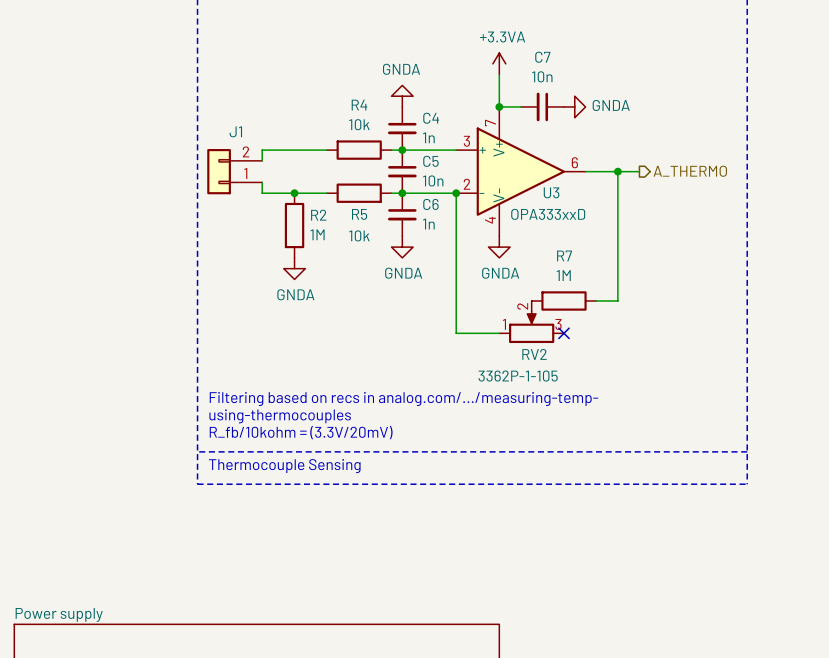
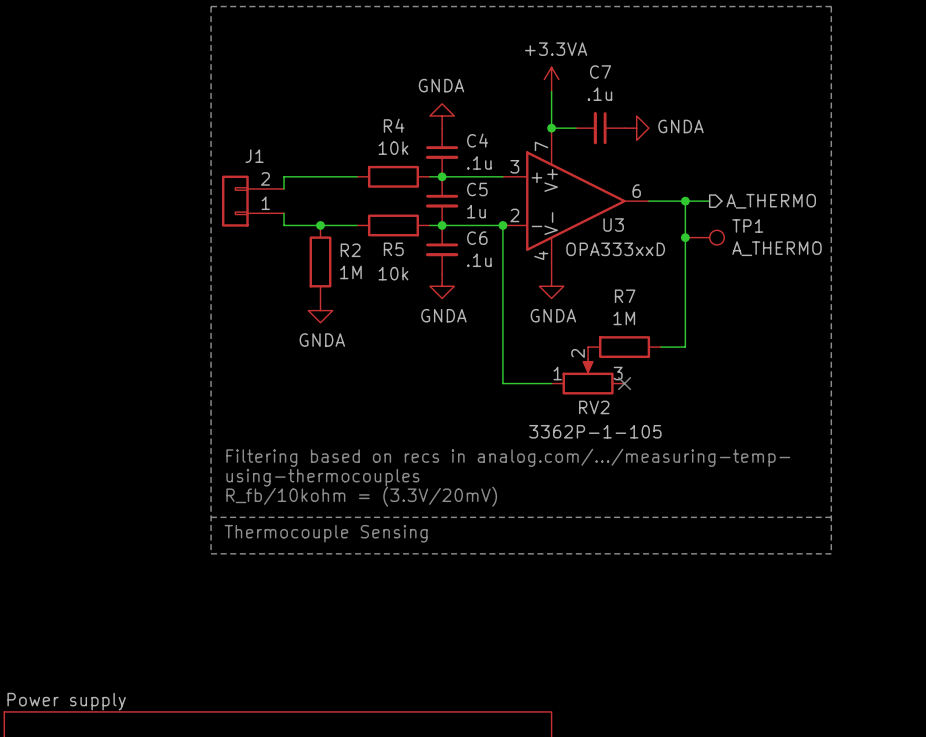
C7 value: 10n (542, 76) -> .1u (599, 94)
C4 value: 1n (428, 137) -> .1u (479, 162)
C5 value: 10n (433, 180) -> 1u (476, 211)
junction: none -> (685, 237)
TP1: none -> A_THERMO (704, 237)
C6 value: 1n (428, 224) -> .1u (479, 260)

